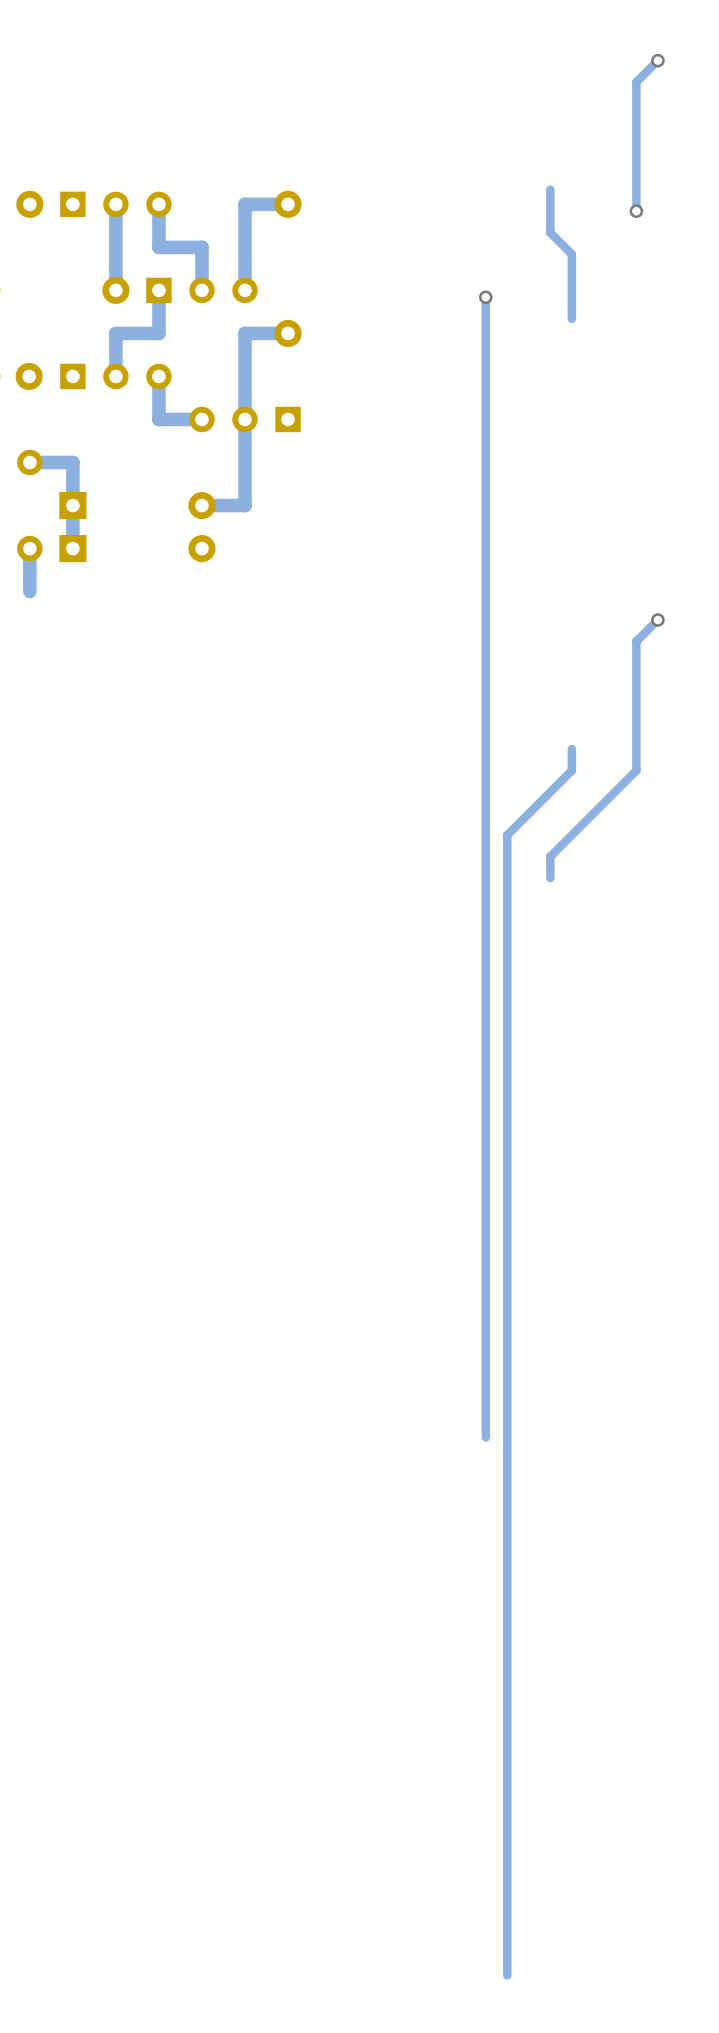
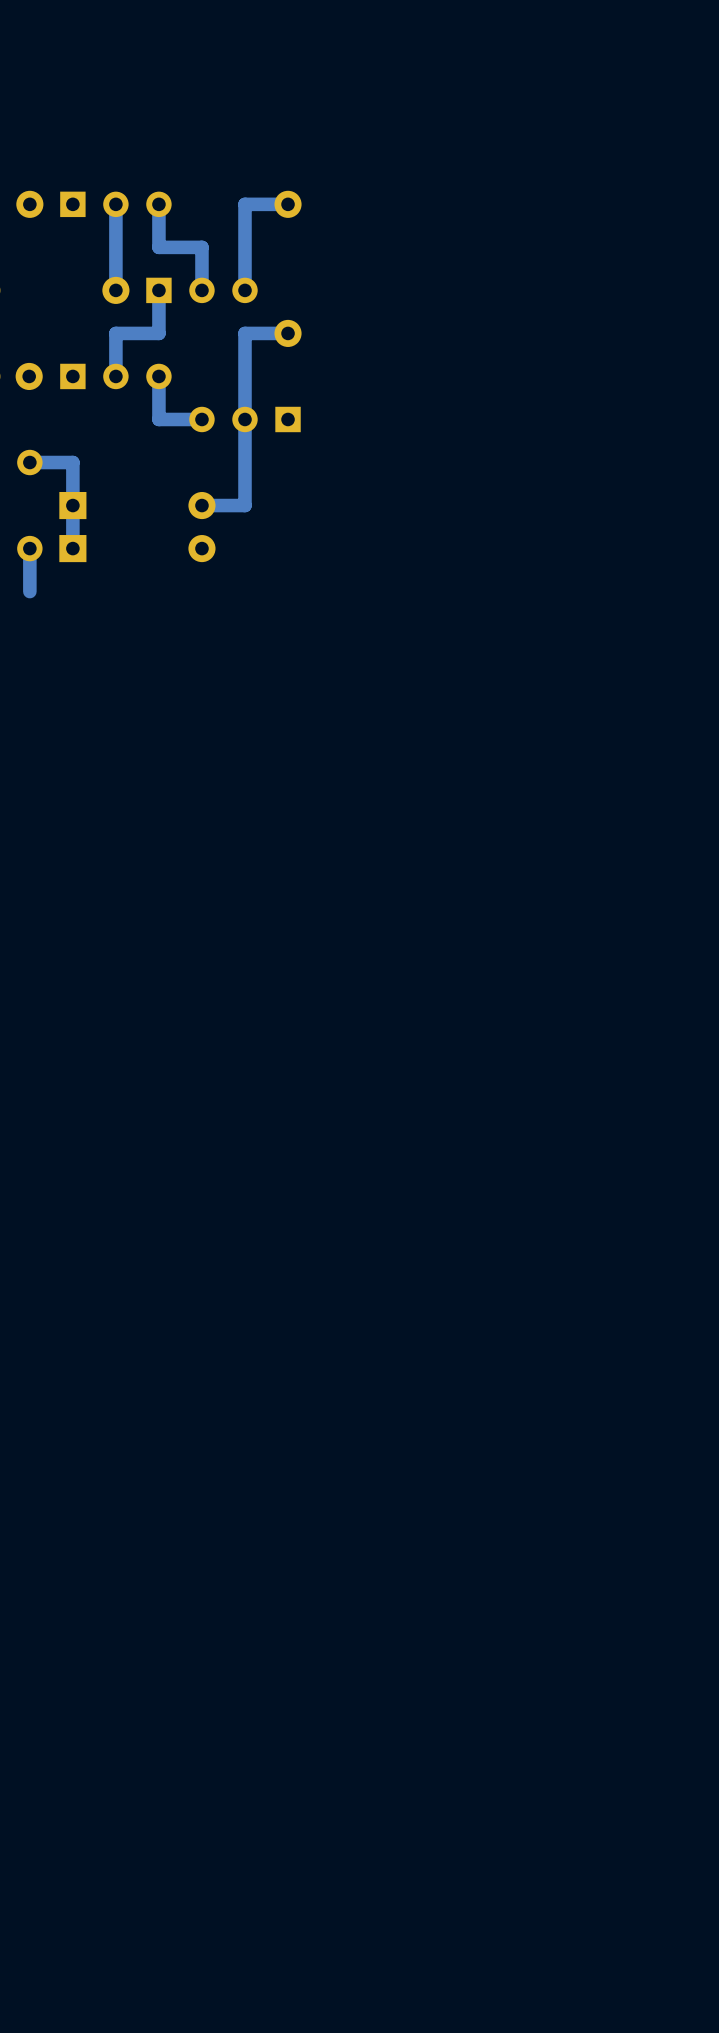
track: (657, 60) (636, 82) (636, 211) -> none
via: (657, 60) -> none
track: (550, 189) (550, 232) (571, 254) (571, 318) -> none
via: (636, 211) -> none
track: (485, 297) (485, 1437) -> none
via: (485, 297) -> none
track: (657, 619) (636, 641) (636, 770) (550, 856) (550, 878) -> none
via: (657, 619) -> none
track: (571, 749) (571, 770) (507, 835) (507, 1975) -> none

